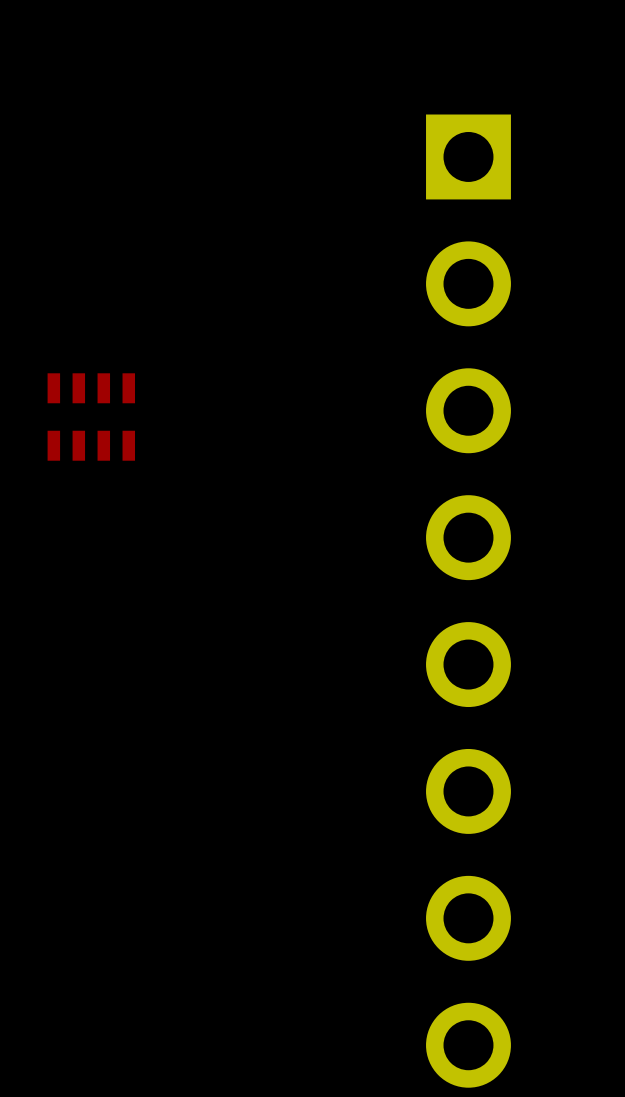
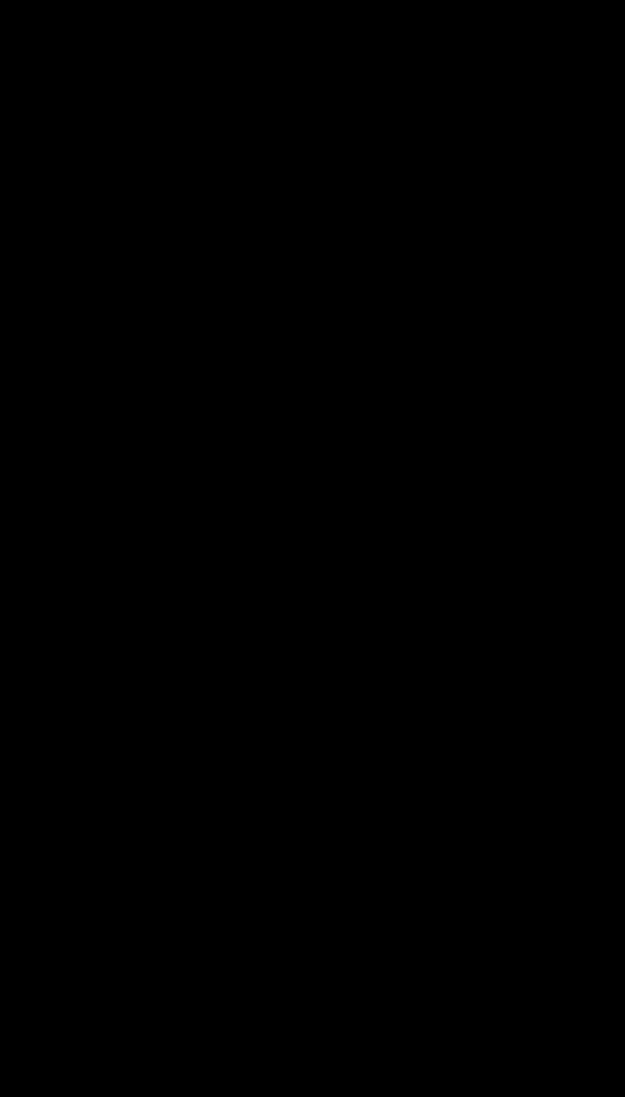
part: (91, 417) -> none
part: (468, 601) -> none

